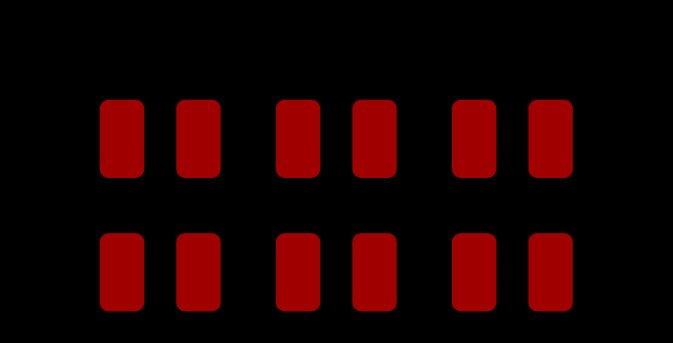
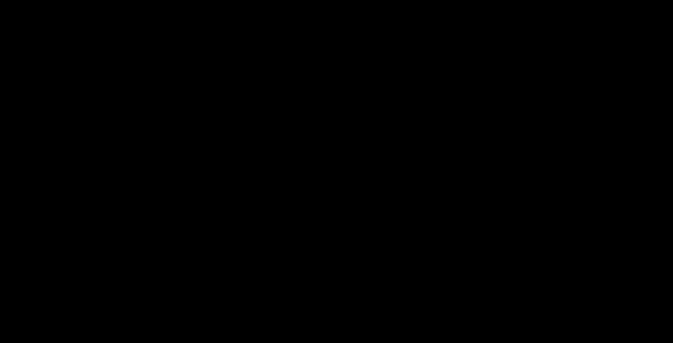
part: (160, 138) -> none
part: (336, 138) -> none
part: (512, 138) -> none
part: (160, 272) -> none
part: (336, 272) -> none
part: (512, 272) -> none

